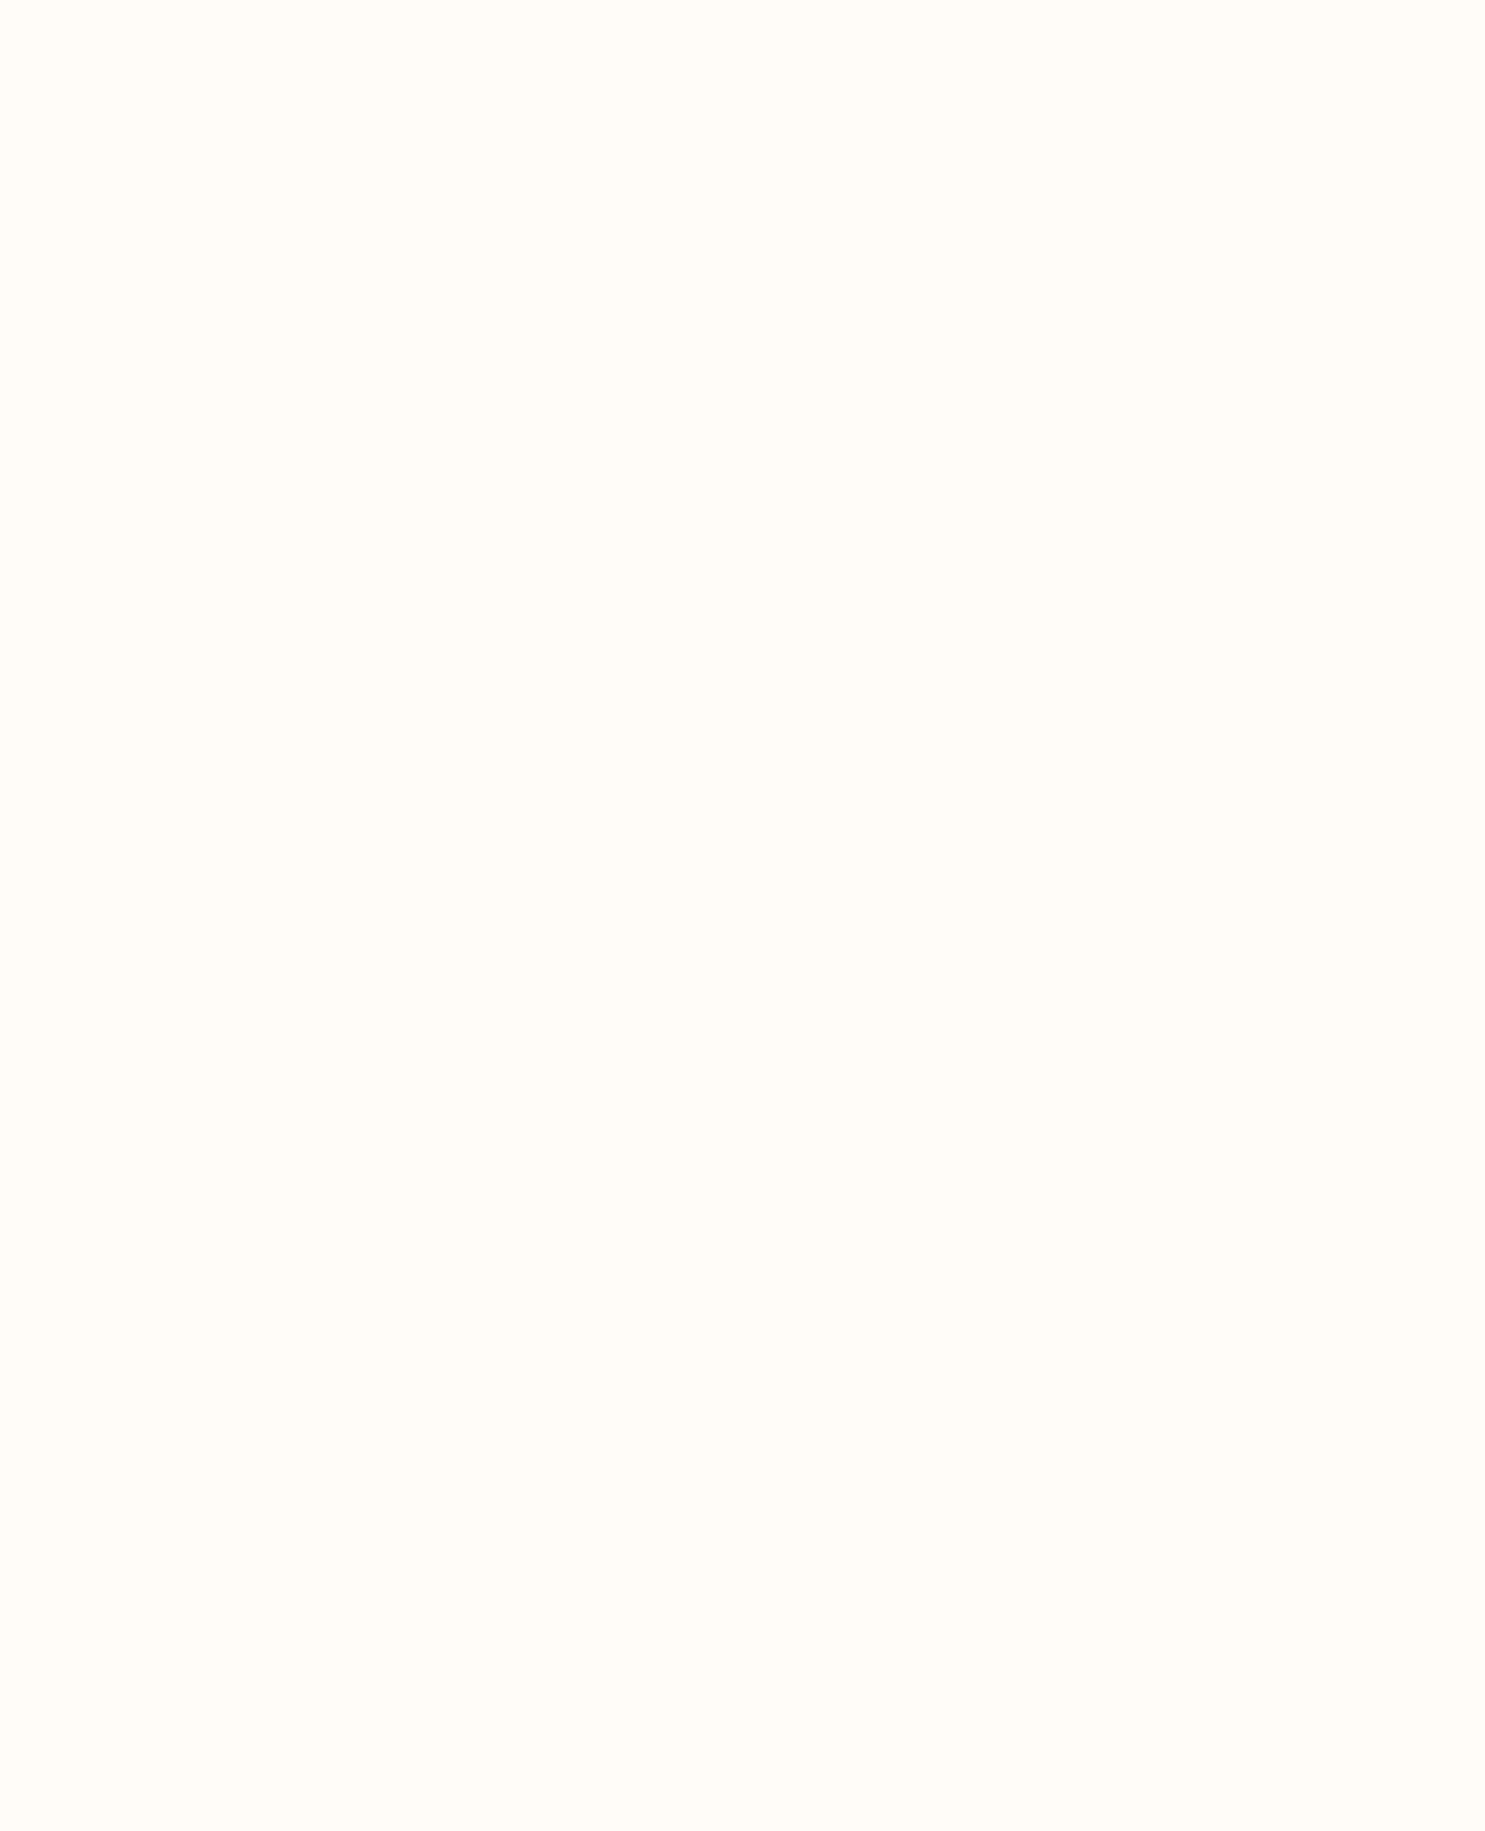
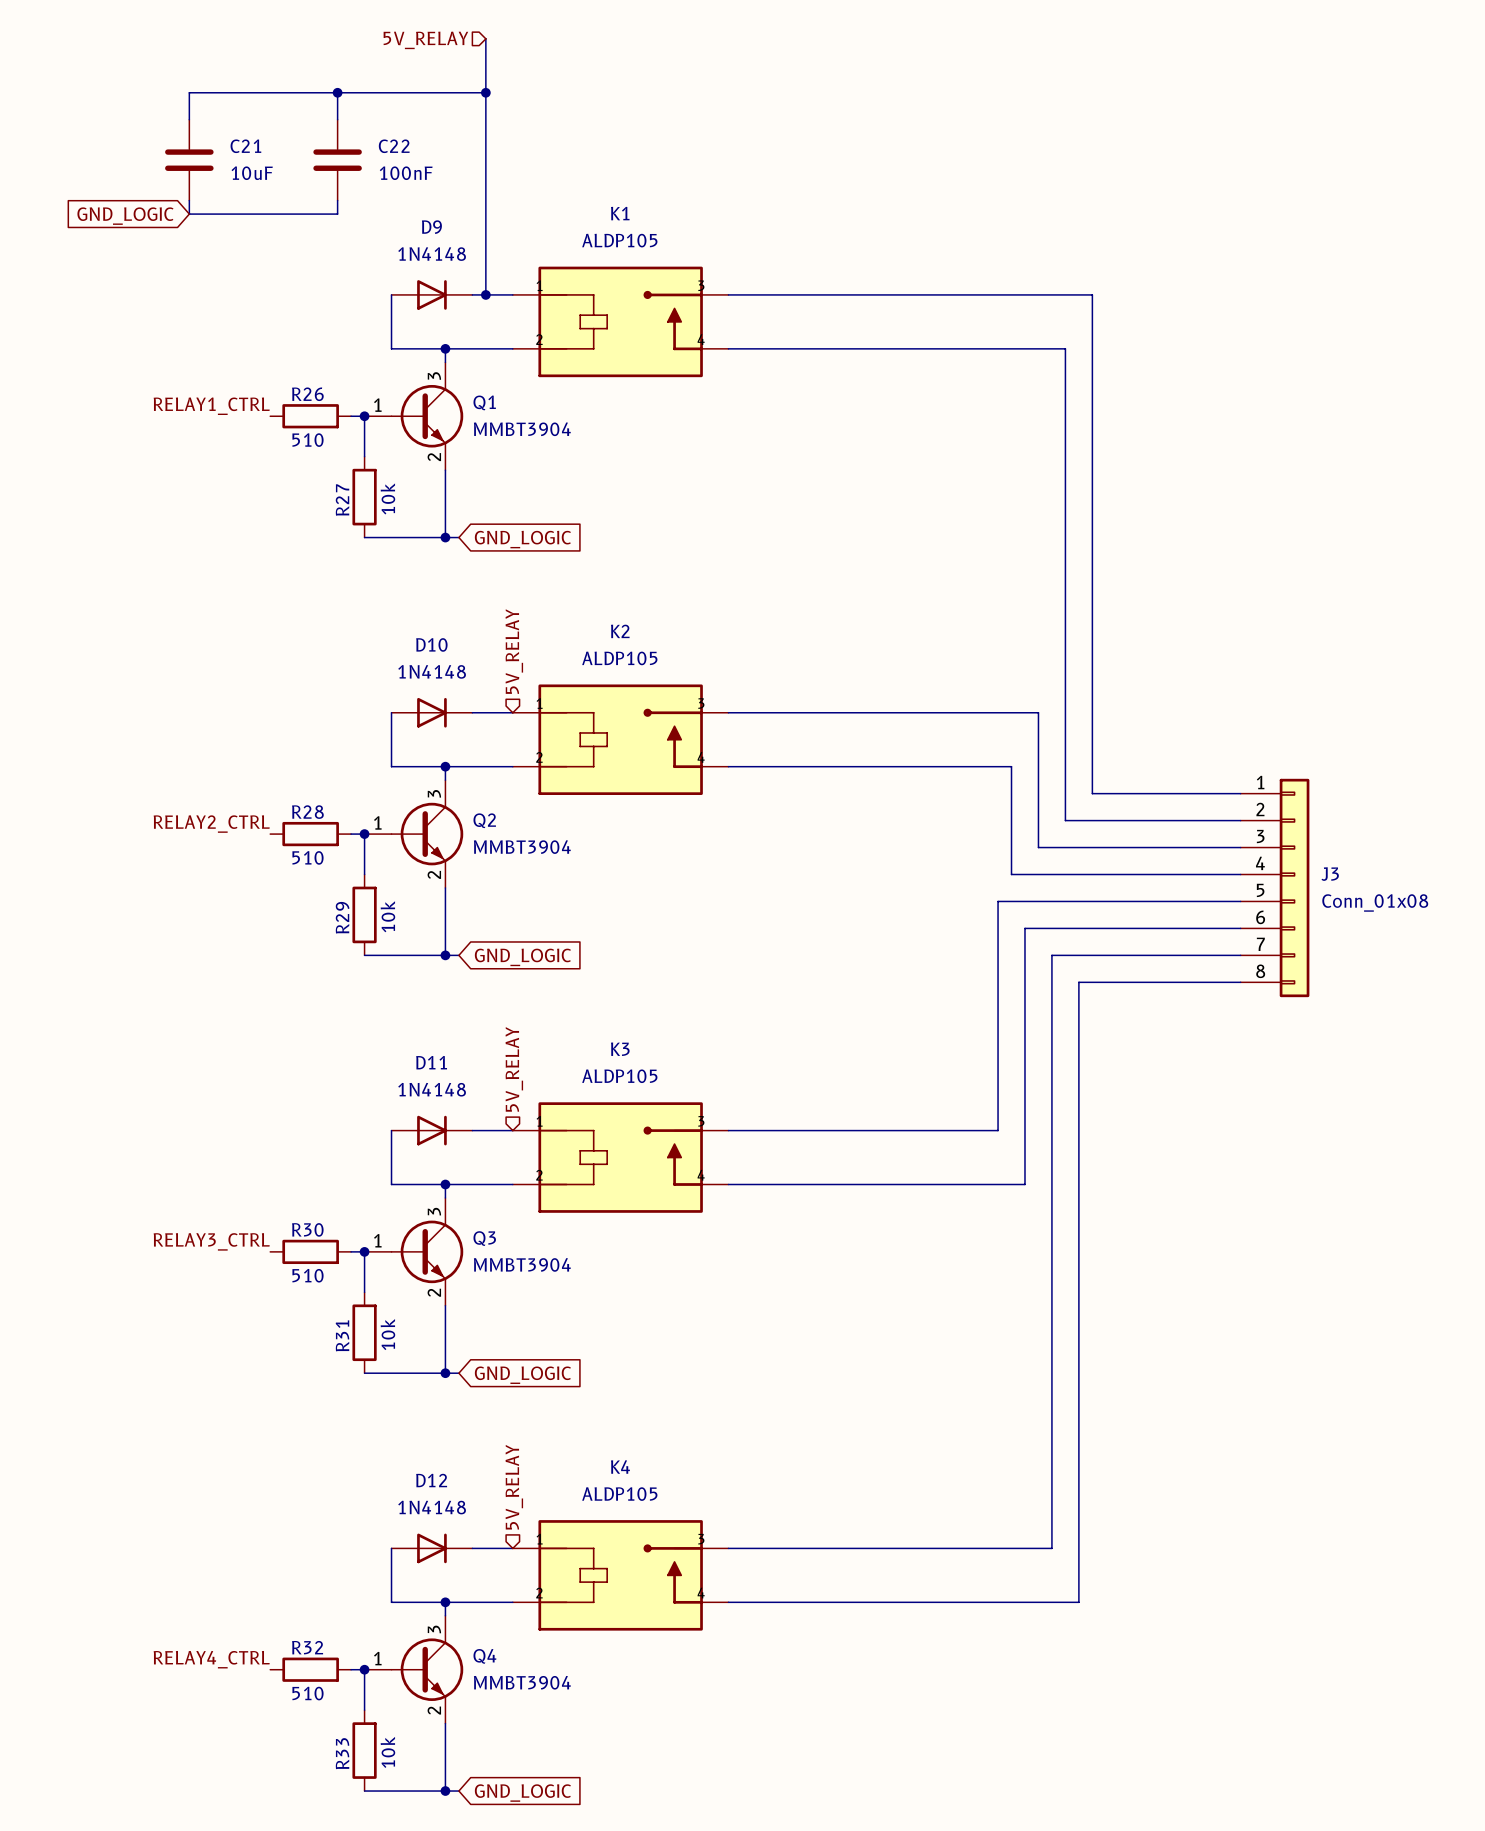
wire: none -> (485, 38) (485, 294)
hierarchical label: none -> 5V_RELAY (425, 40)
wire: none -> (337, 92) (337, 119)
junction: none -> (337, 92)
wire: none -> (485, 92) (189, 92) (189, 119)
junction: none -> (485, 92)
C21: none -> 10uF (189, 160)
C22: none -> 100nF (337, 160)
wire: none -> (189, 200) (189, 214) (337, 214) (337, 200)
global label: none -> GND_LOGIC (125, 216)
wire: none -> (391, 294) (391, 348) (512, 348)
D9: none -> 1N4148 (431, 294)
wire: none -> (472, 294) (512, 294)
junction: none -> (485, 294)
wire: none -> (728, 294) (1092, 294) (1092, 793) (1240, 793)
K1: none -> ALDP105 (620, 321)
wire: none -> (445, 348) (445, 362)
junction: none -> (445, 348)
wire: none -> (728, 348) (1065, 348) (1065, 820) (1240, 820)
label: none -> RELAY1_CTRL (211, 406)
R26: none -> 510 (310, 416)
wire: none -> (351, 416) (364, 416) (364, 456)
junction: none -> (364, 416)
Q1: none -> MMBT3904 (413, 416)
wire: none -> (445, 470) (445, 537)
R27: none -> 10k (364, 497)
wire: none -> (364, 537) (458, 537)
junction: none -> (445, 537)
global label: none -> GND_LOGIC (522, 539)
hierarchical label: none -> 5V_RELAY (514, 651)
wire: none -> (391, 712) (391, 766) (512, 766)
D10: none -> 1N4148 (431, 712)
wire: none -> (472, 712) (512, 712)
wire: none -> (728, 712) (1038, 712) (1038, 847) (1240, 847)
K2: none -> ALDP105 (620, 739)
wire: none -> (445, 766) (445, 780)
junction: none -> (445, 766)
wire: none -> (728, 766) (1011, 766) (1011, 874) (1240, 874)
label: none -> RELAY2_CTRL (211, 824)
R28: none -> 510 (310, 834)
wire: none -> (351, 834) (364, 834) (364, 874)
junction: none -> (364, 834)
Q2: none -> MMBT3904 (413, 834)
wire: none -> (445, 887) (445, 955)
J3: none -> Conn_01x08 (1275, 887)
wire: none -> (1240, 901) (998, 901) (998, 1130) (728, 1130)
R29: none -> 10k (364, 914)
wire: none -> (1240, 928) (1024, 928) (1024, 1184) (728, 1184)
wire: none -> (364, 955) (458, 955)
junction: none -> (445, 955)
wire: none -> (1240, 955) (1051, 955) (1051, 1548) (728, 1548)
global label: none -> GND_LOGIC (522, 957)
wire: none -> (1240, 982) (1078, 982) (1078, 1602) (728, 1602)
hierarchical label: none -> 5V_RELAY (514, 1069)
wire: none -> (391, 1130) (391, 1184) (512, 1184)
D11: none -> 1N4148 (431, 1130)
wire: none -> (472, 1130) (512, 1130)
K3: none -> ALDP105 (620, 1157)
wire: none -> (445, 1184) (445, 1197)
junction: none -> (445, 1184)
label: none -> RELAY3_CTRL (211, 1241)
R30: none -> 510 (310, 1251)
wire: none -> (351, 1251) (364, 1251) (364, 1292)
junction: none -> (364, 1251)
Q3: none -> MMBT3904 (413, 1251)
wire: none -> (445, 1305) (445, 1373)
R31: none -> 10k (364, 1332)
wire: none -> (364, 1373) (458, 1373)
junction: none -> (445, 1373)
global label: none -> GND_LOGIC (522, 1375)
hierarchical label: none -> 5V_RELAY (514, 1487)
wire: none -> (391, 1548) (391, 1602) (512, 1602)
D12: none -> 1N4148 (431, 1548)
wire: none -> (472, 1548) (512, 1548)
K4: none -> ALDP105 (620, 1575)
wire: none -> (445, 1602) (445, 1615)
junction: none -> (445, 1602)
label: none -> RELAY4_CTRL (211, 1659)
R32: none -> 510 (310, 1669)
wire: none -> (351, 1669) (364, 1669) (364, 1710)
junction: none -> (364, 1669)
Q4: none -> MMBT3904 (413, 1669)
wire: none -> (445, 1723) (445, 1791)
R33: none -> 10k (364, 1750)
wire: none -> (364, 1791) (458, 1791)
junction: none -> (445, 1791)
global label: none -> GND_LOGIC (522, 1793)

